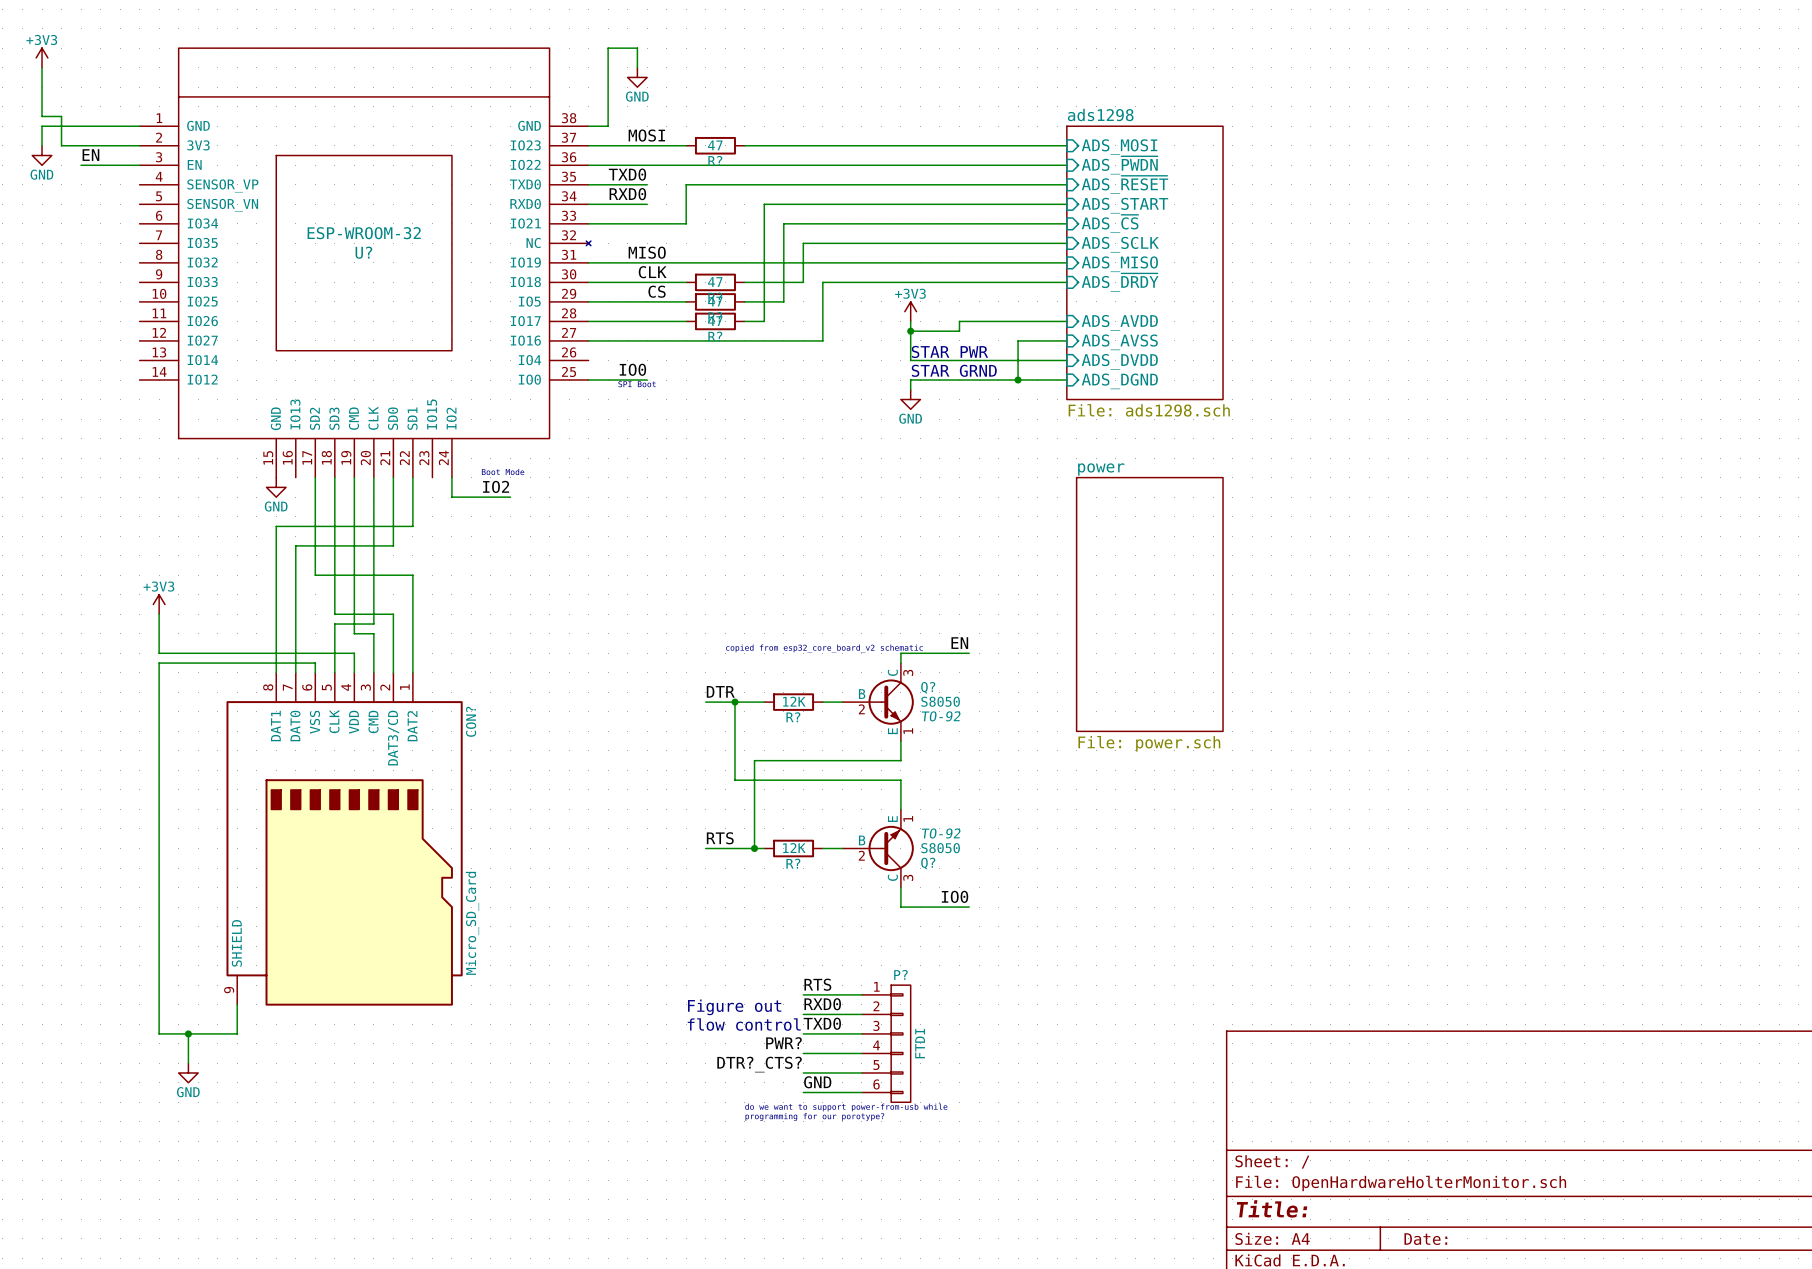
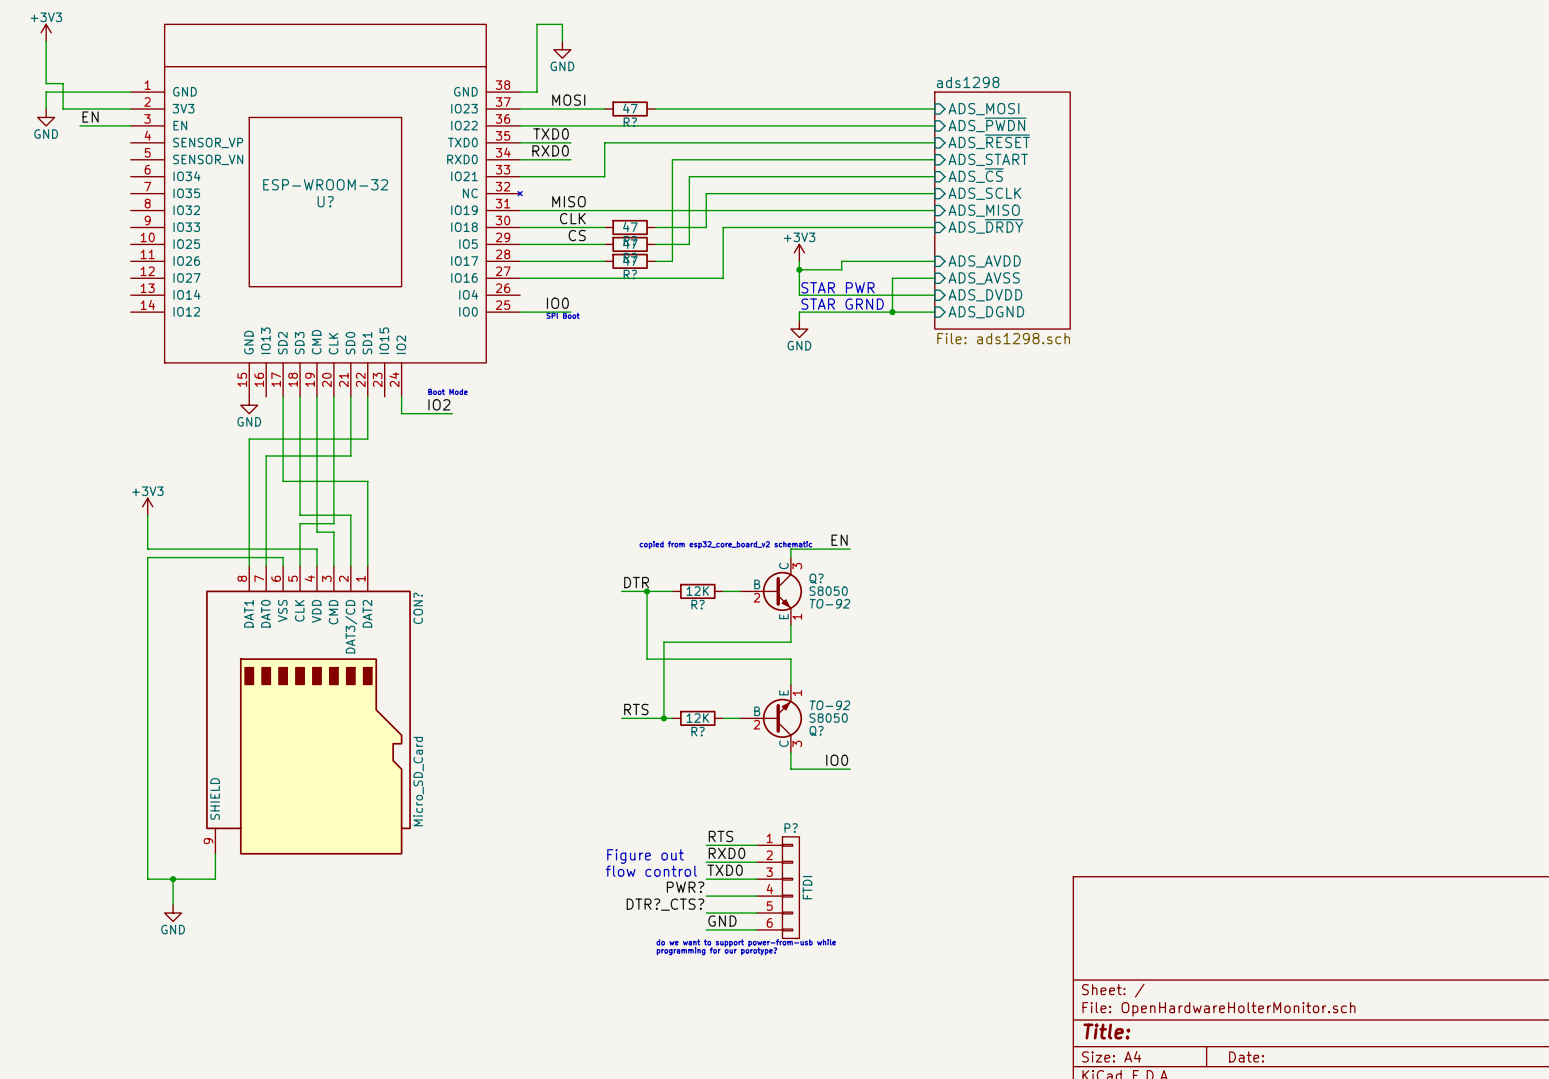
sheet power: File: power.sch (1149, 604) -> none

